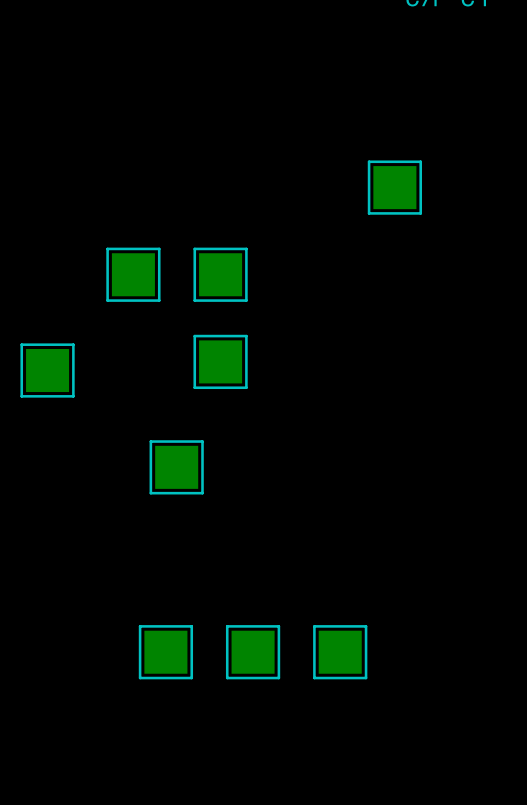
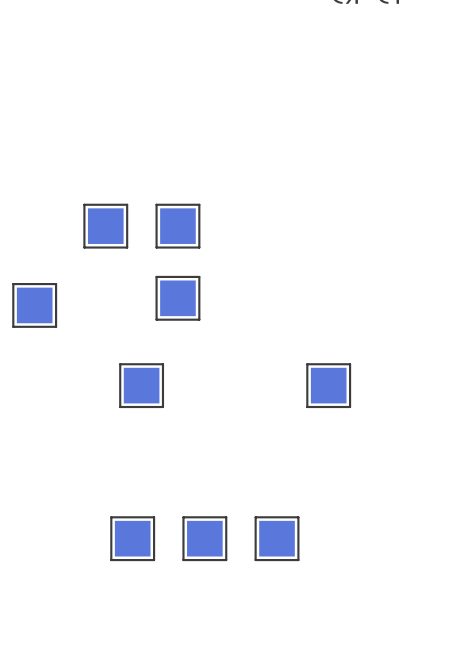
part position: (394, 187) -> (328, 385)

